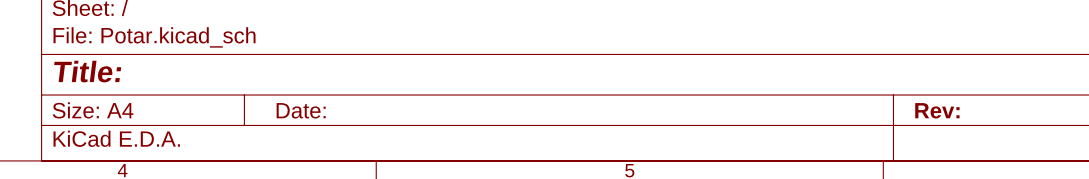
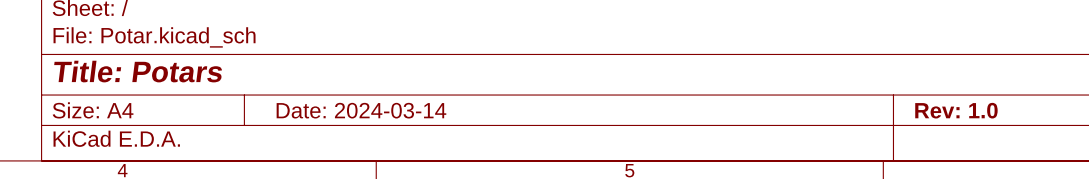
title block: Title: (87, 71) -> Title: Potars (138, 71)
title block: Date: (301, 110) -> Date: 2024-03-14 (361, 110)
title block: Rev: (937, 110) -> Rev: 1.0 (956, 110)

